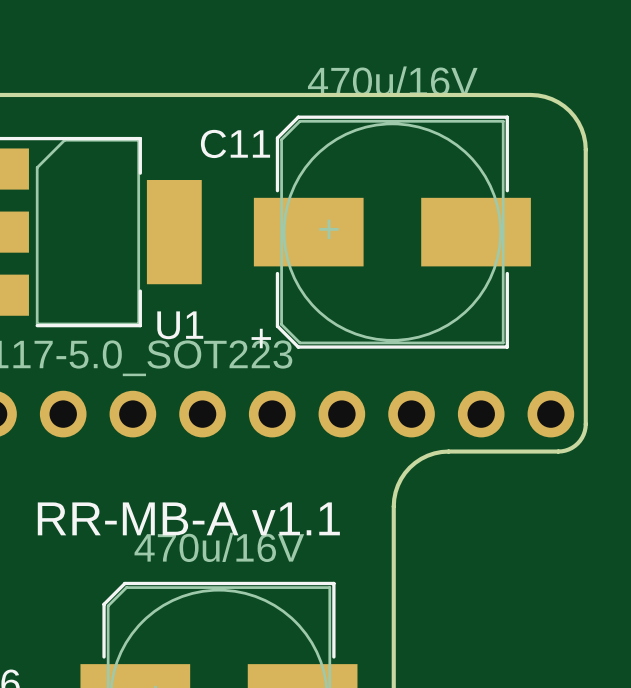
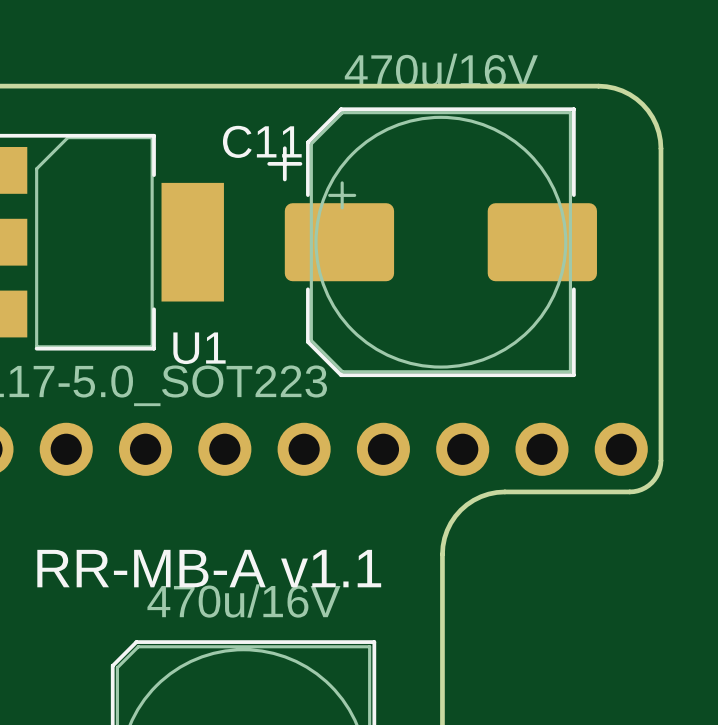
C11 footprint: [253, 115, 531, 349] -> [267, 107, 597, 378]

